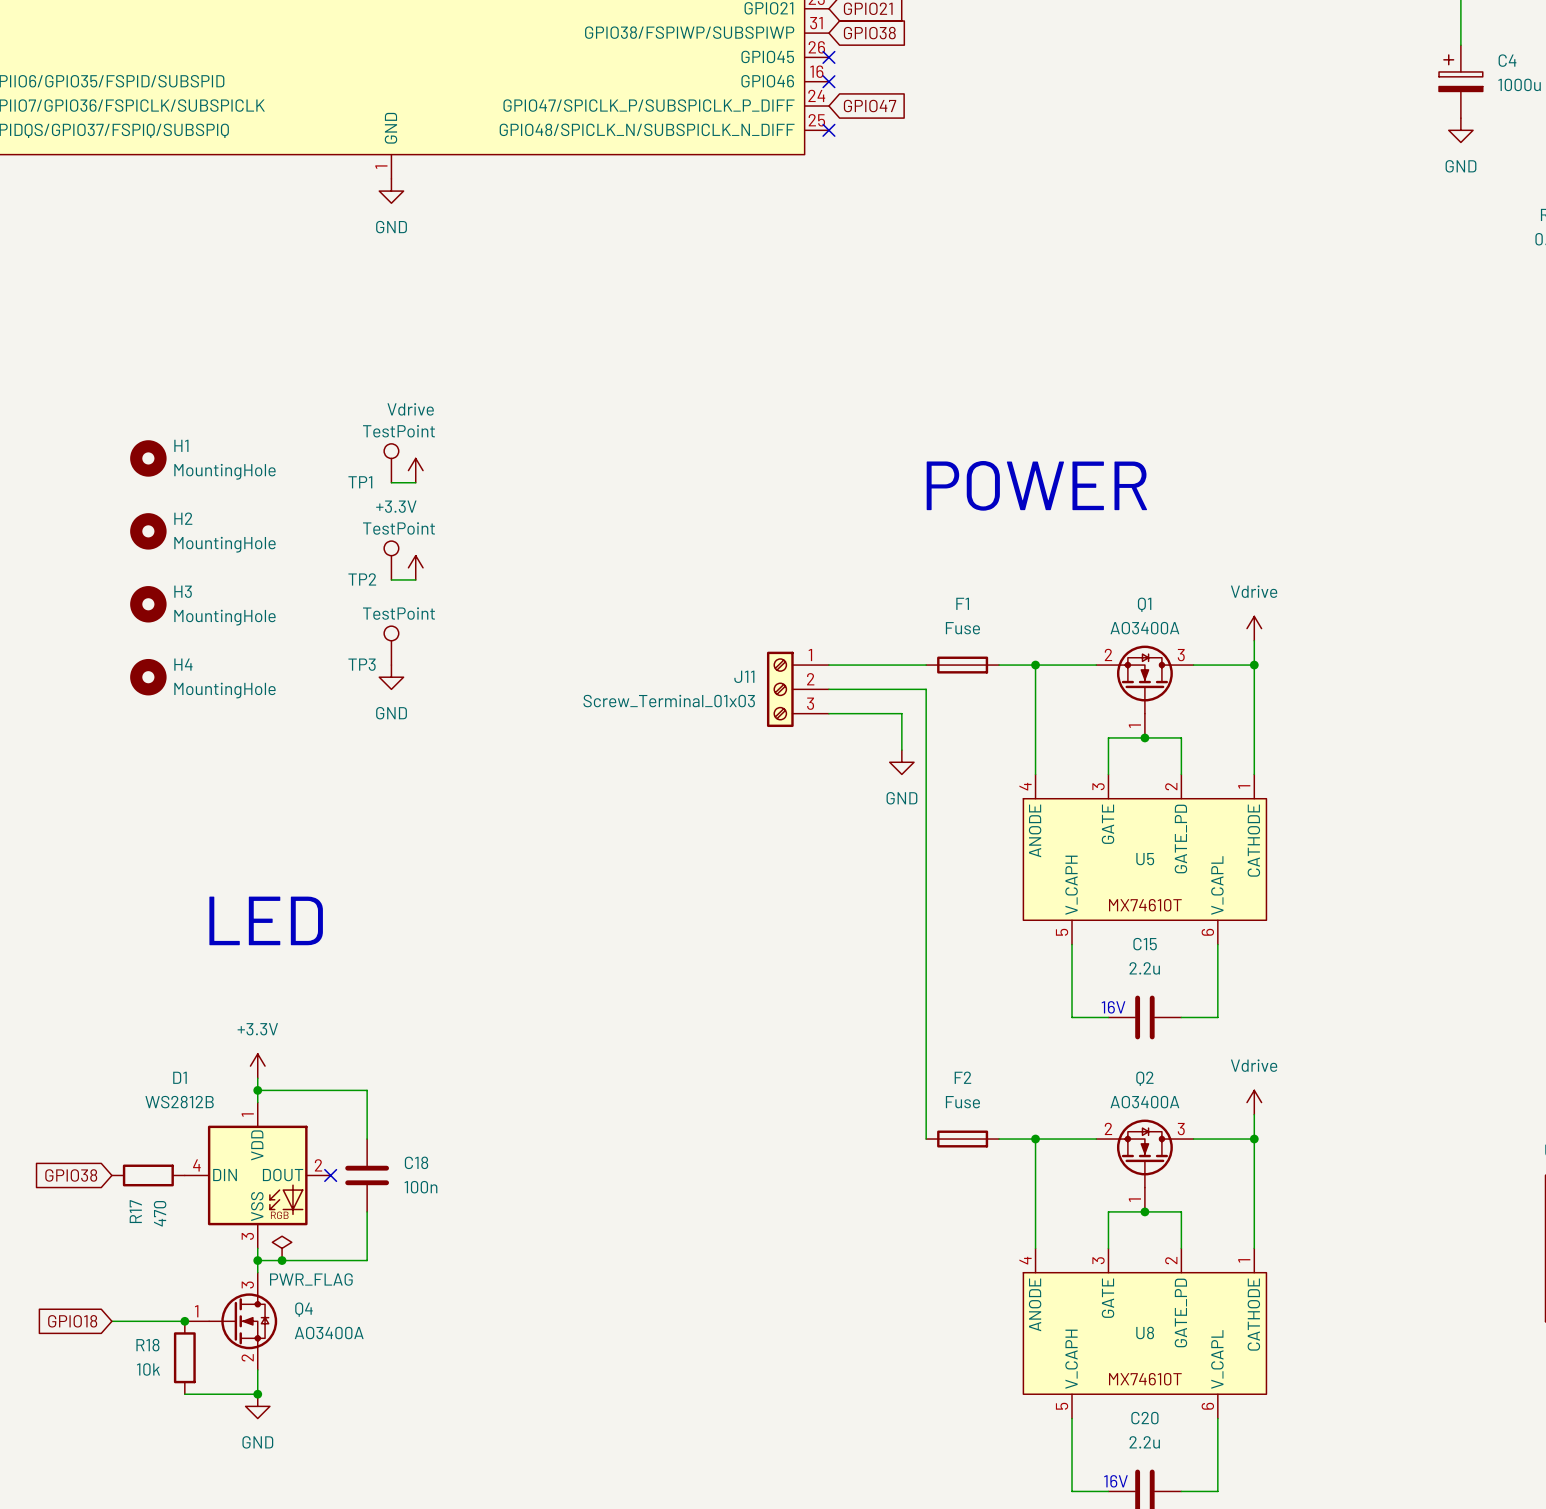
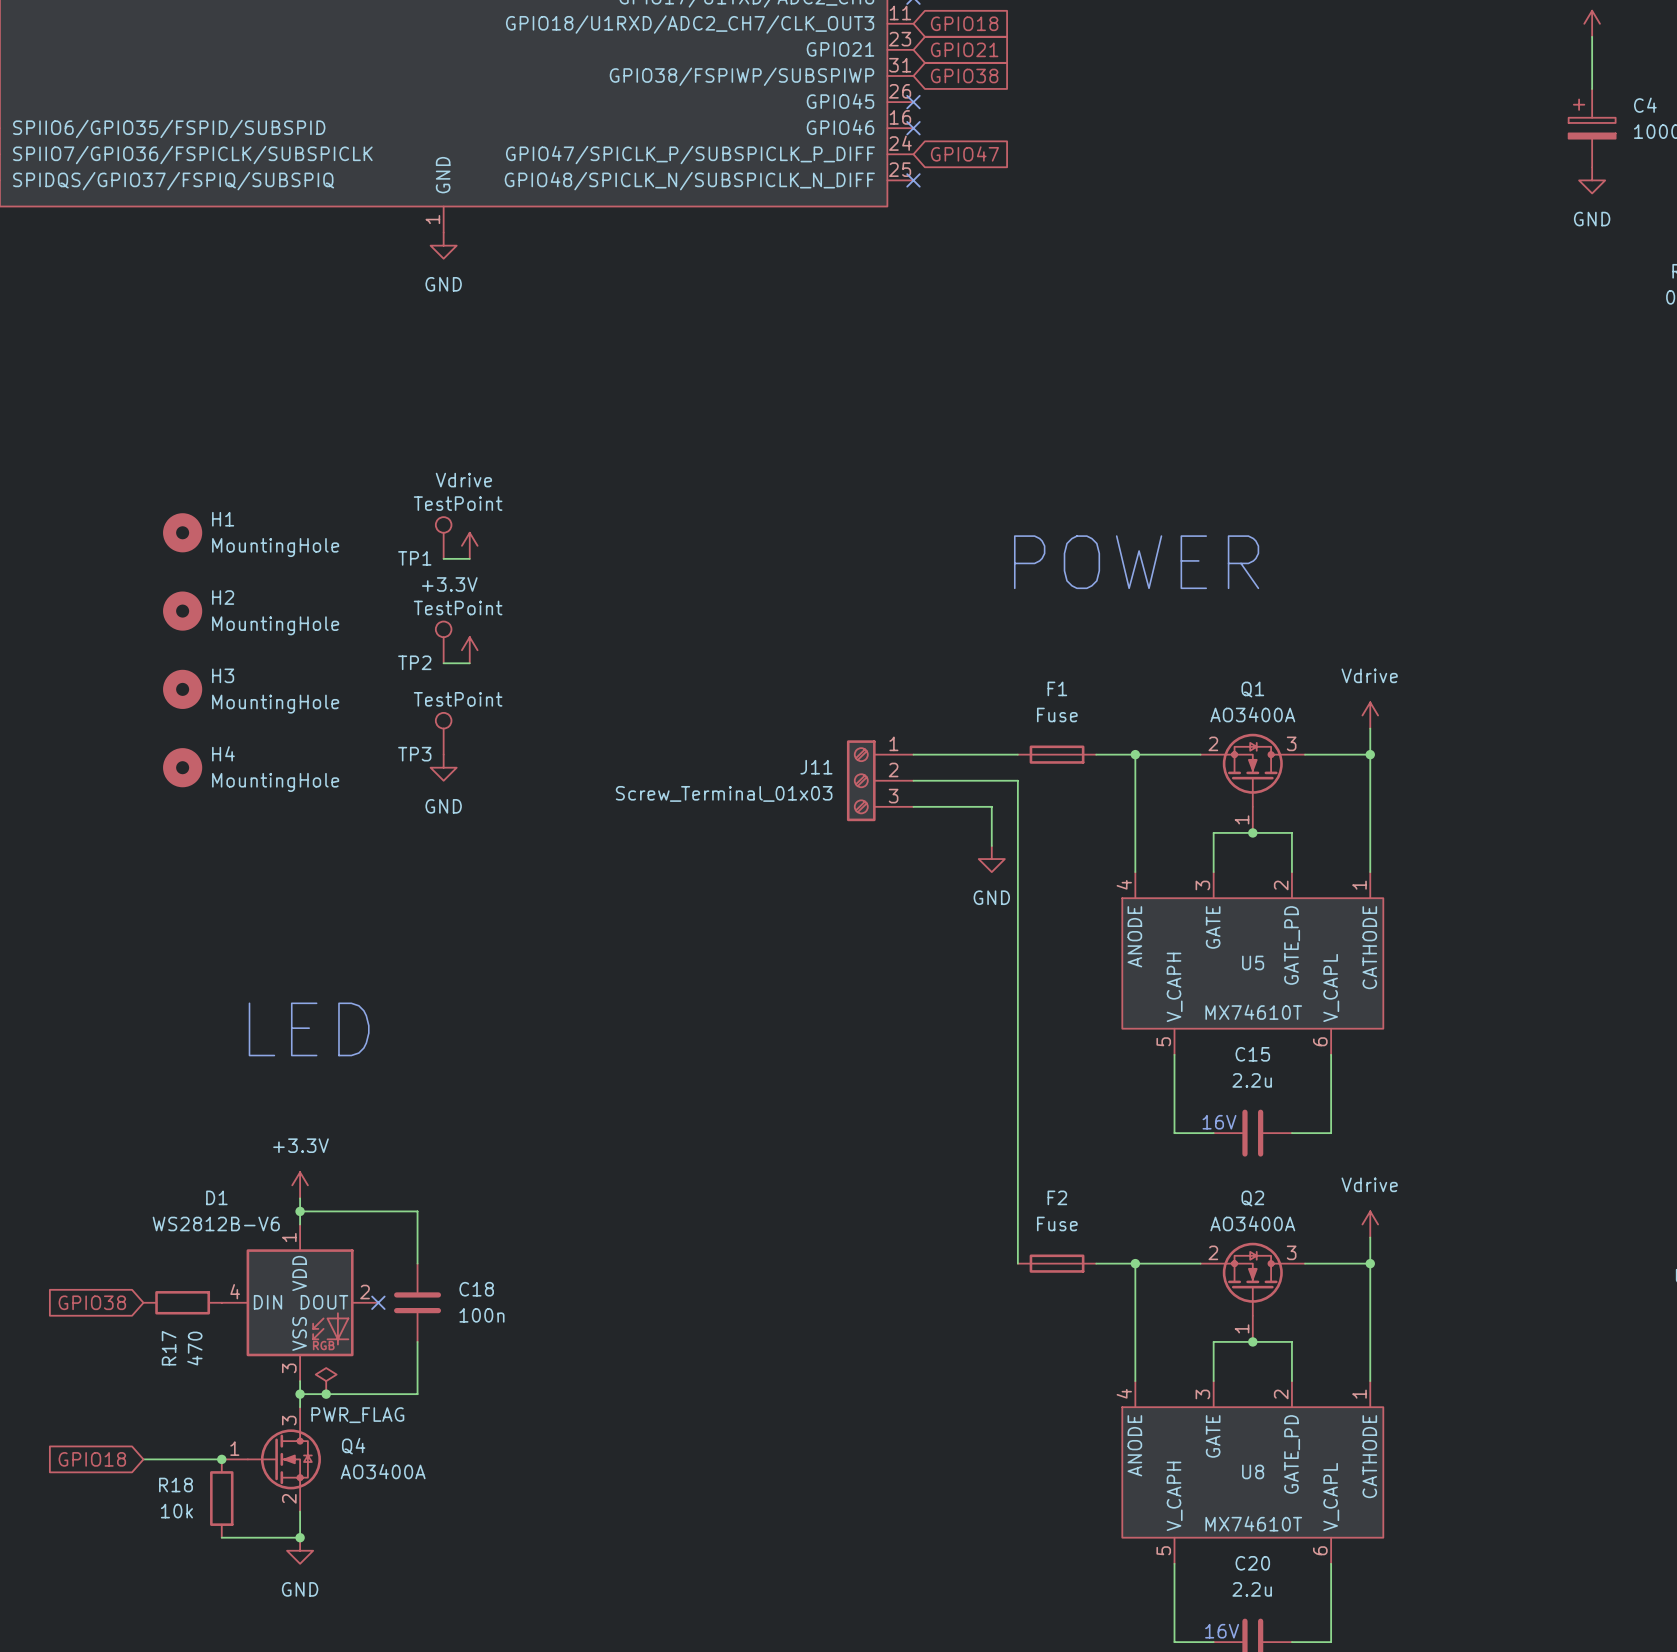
U5 text: MX74610T (1145, 905) -> none
U5 value: none -> MX74610T (1253, 1012)
D1 value: WS2812B (179, 1102) -> WS2812B-V6 (216, 1223)
U8 text: MX74610T (1145, 1379) -> none
U8 value: none -> MX74610T (1253, 1523)

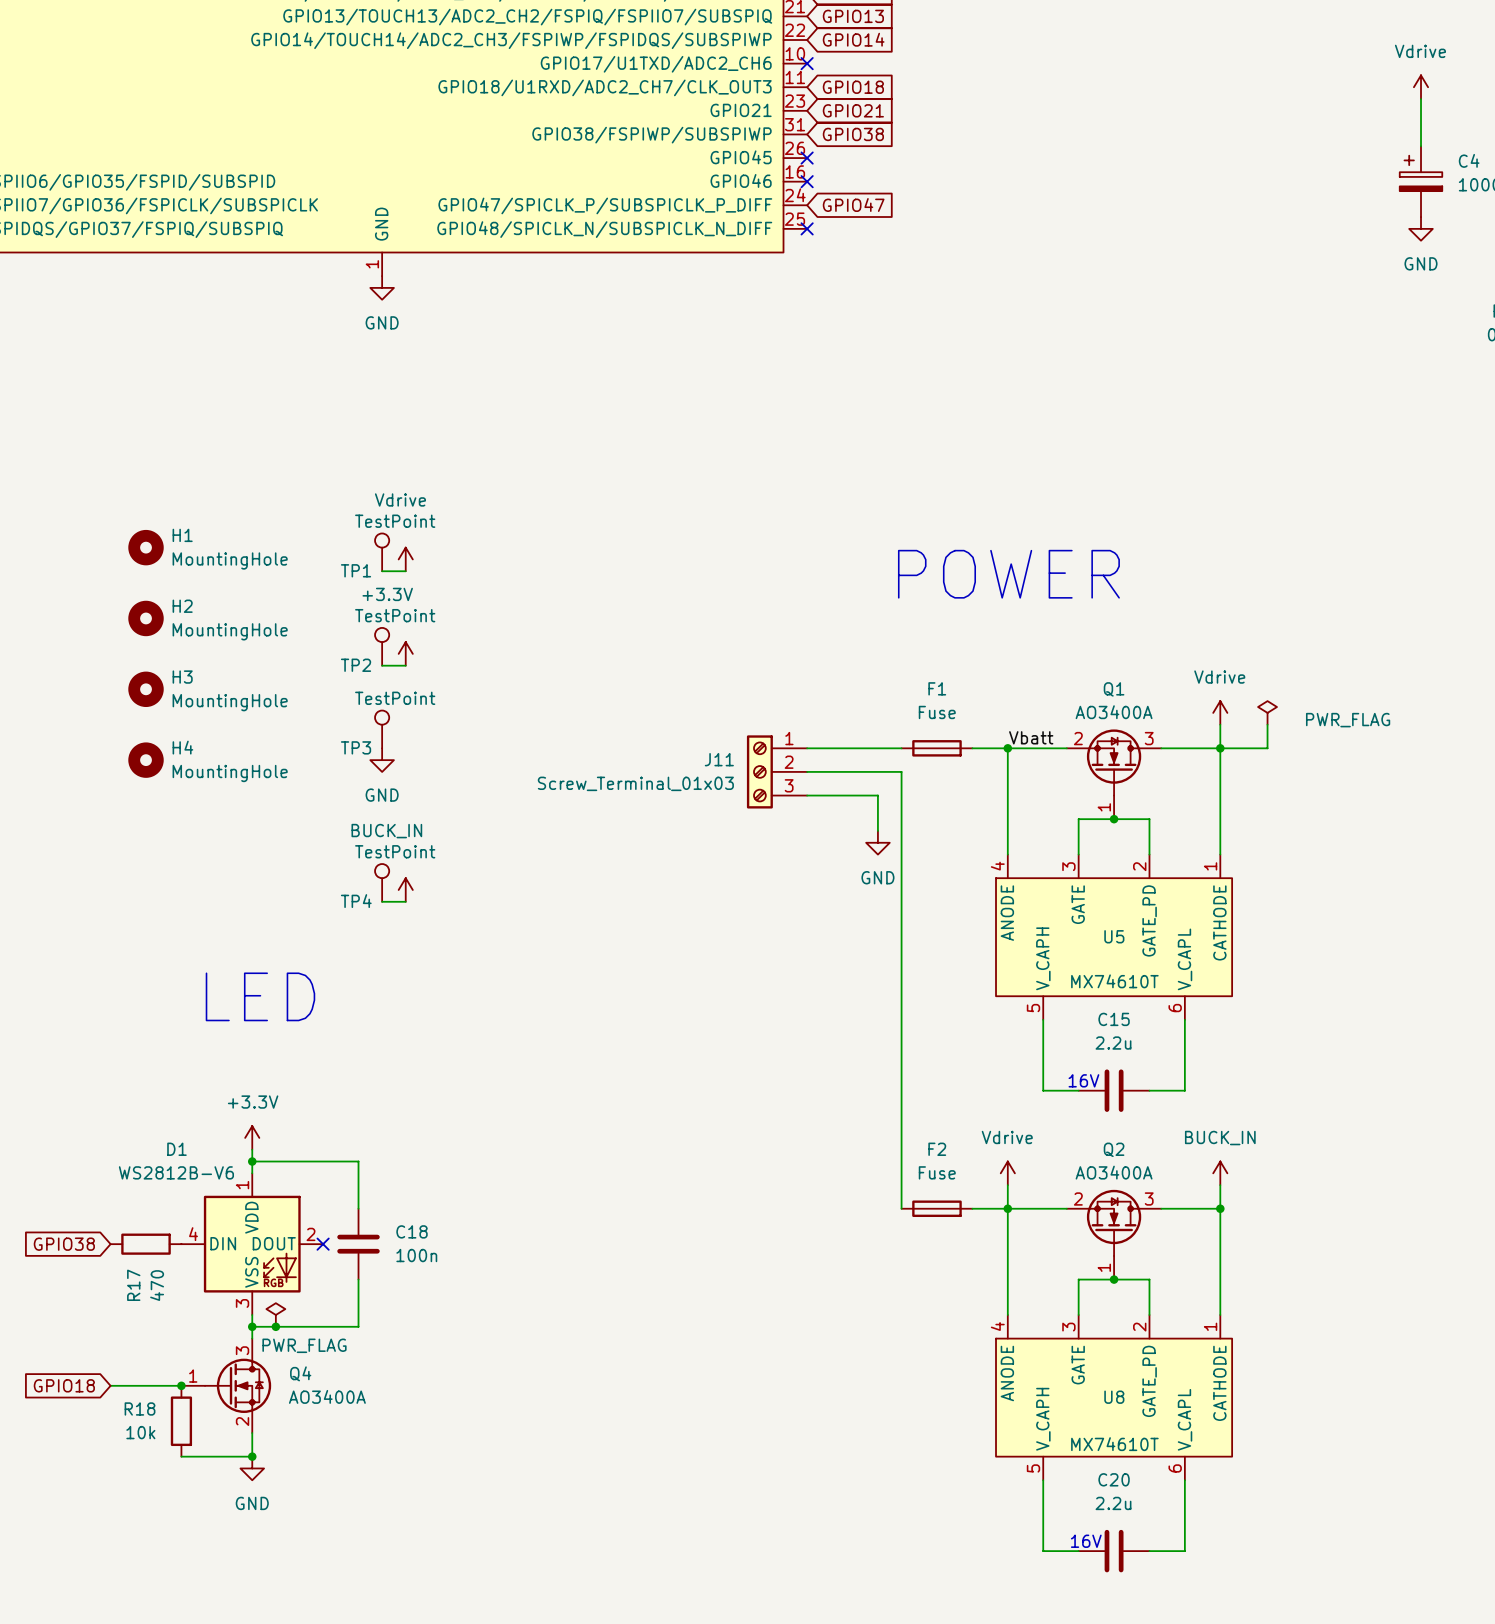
power symbol: none -> PWR_FLAG (1267, 712)
wire: none -> (1267, 724) (1267, 748) (1220, 748)
label: none -> Vbatt (1031, 737)
TP4: none -> TestPoint (382, 882)
power symbol: none -> BUCK_IN (405, 889)
wire: none -> (382, 901) (405, 901)
power symbol: none -> Vdrive (1007, 1173)
power symbol: Vdrive (1370, 1224) -> BUCK_IN (1220, 1173)
wire: none -> (1007, 1185) (1007, 1208)

